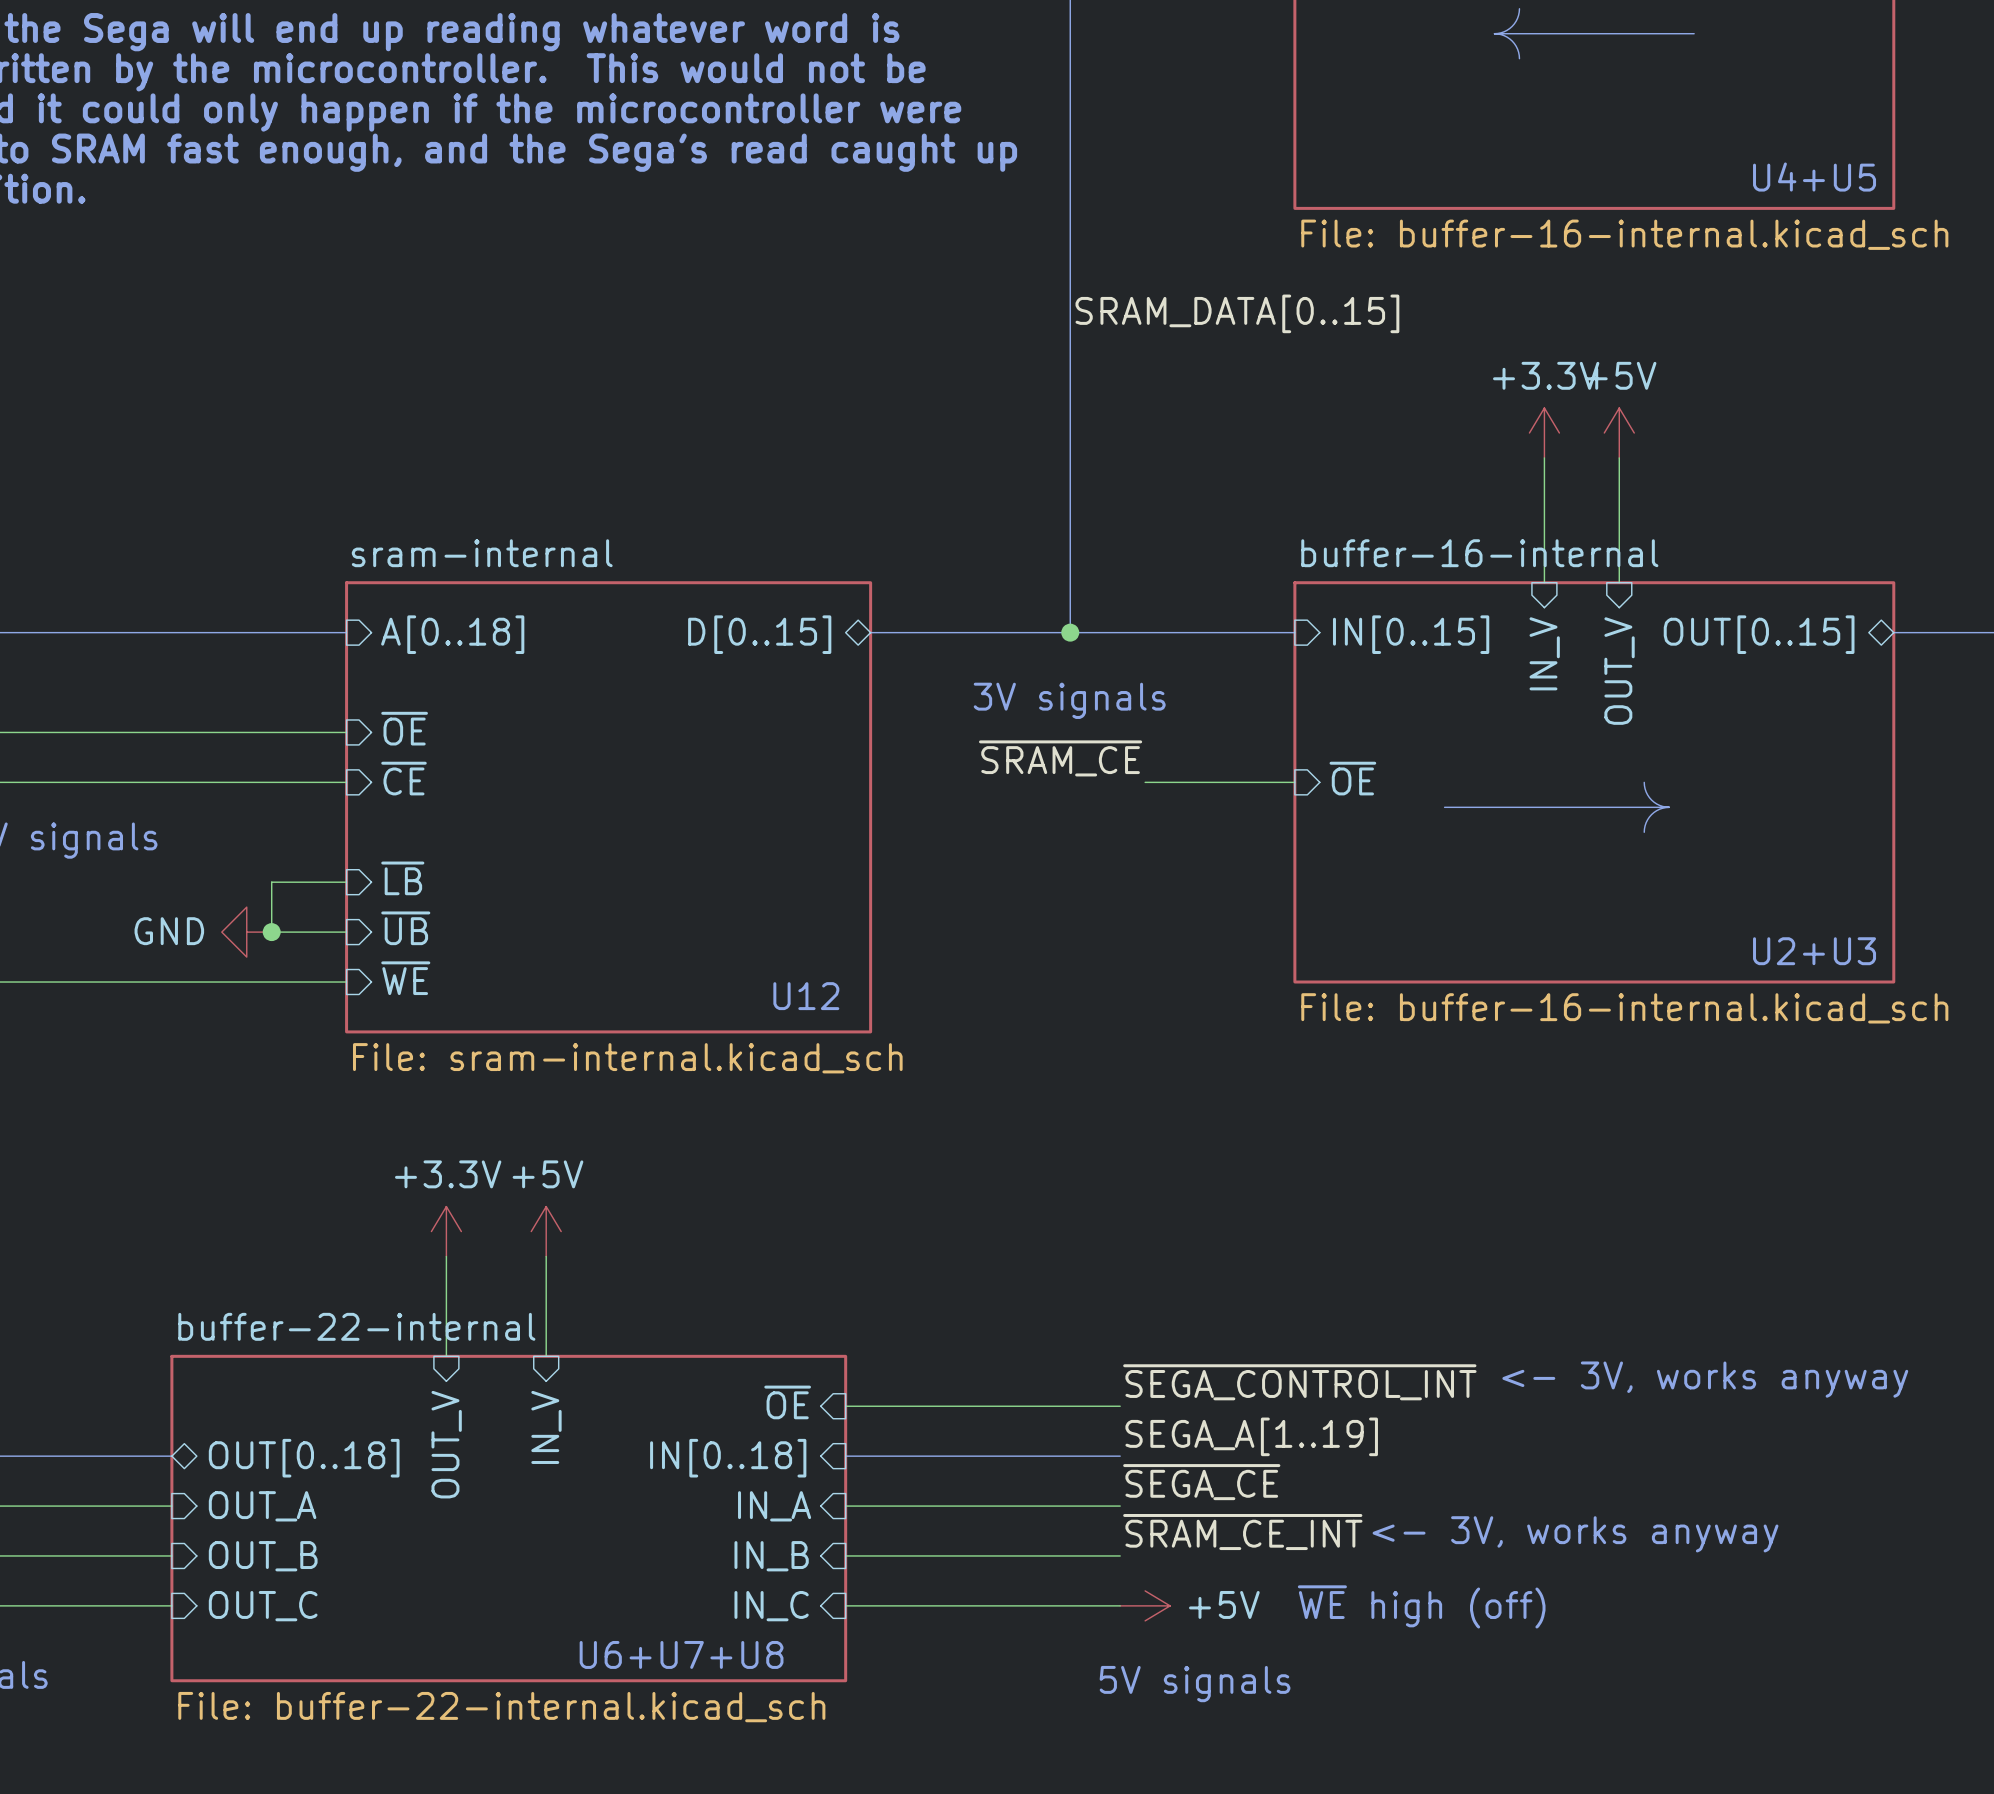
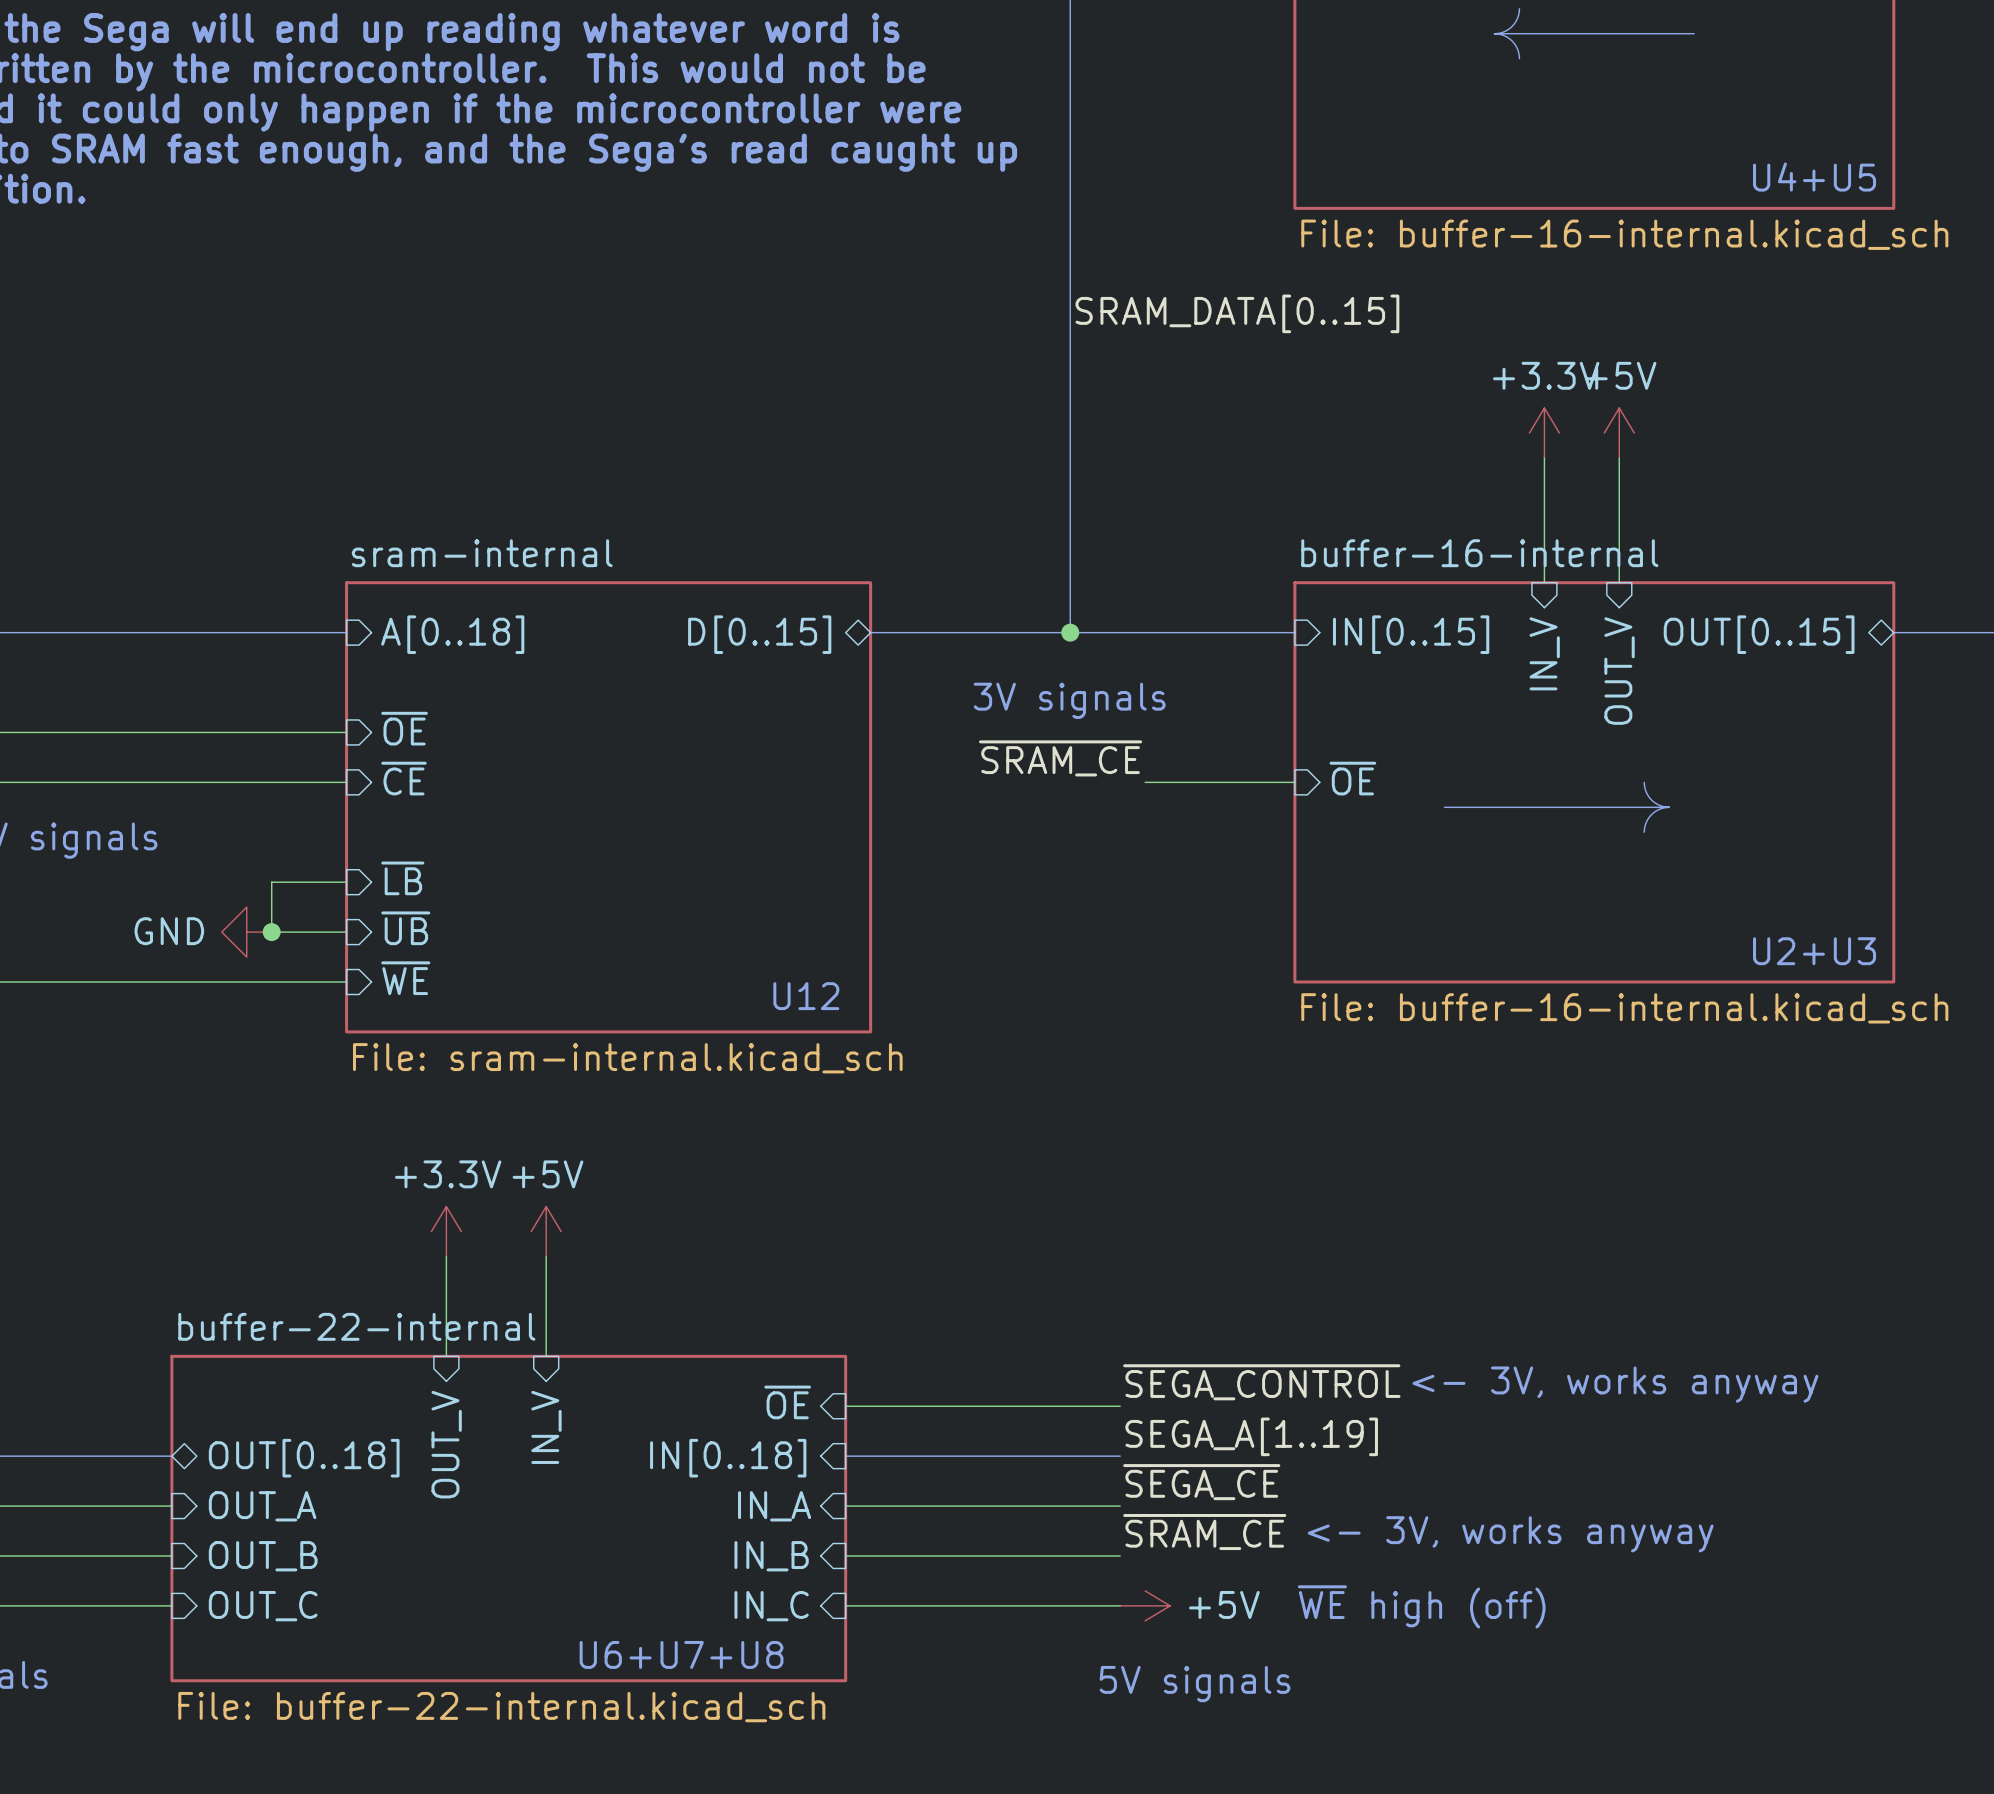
text position: <- 3V, works anyway (1705, 1379) -> <- 3V, works anyway (1615, 1384)
label: ~{SEGA_CONTROL_INT} (1299, 1382) -> ~{SEGA_CONTROL} (1261, 1382)
label: ~{SRAM_CE_INT} (1242, 1532) -> ~{SRAM_CE} (1204, 1532)
text position: <- 3V, works anyway (1575, 1534) -> <- 3V, works anyway (1510, 1534)

